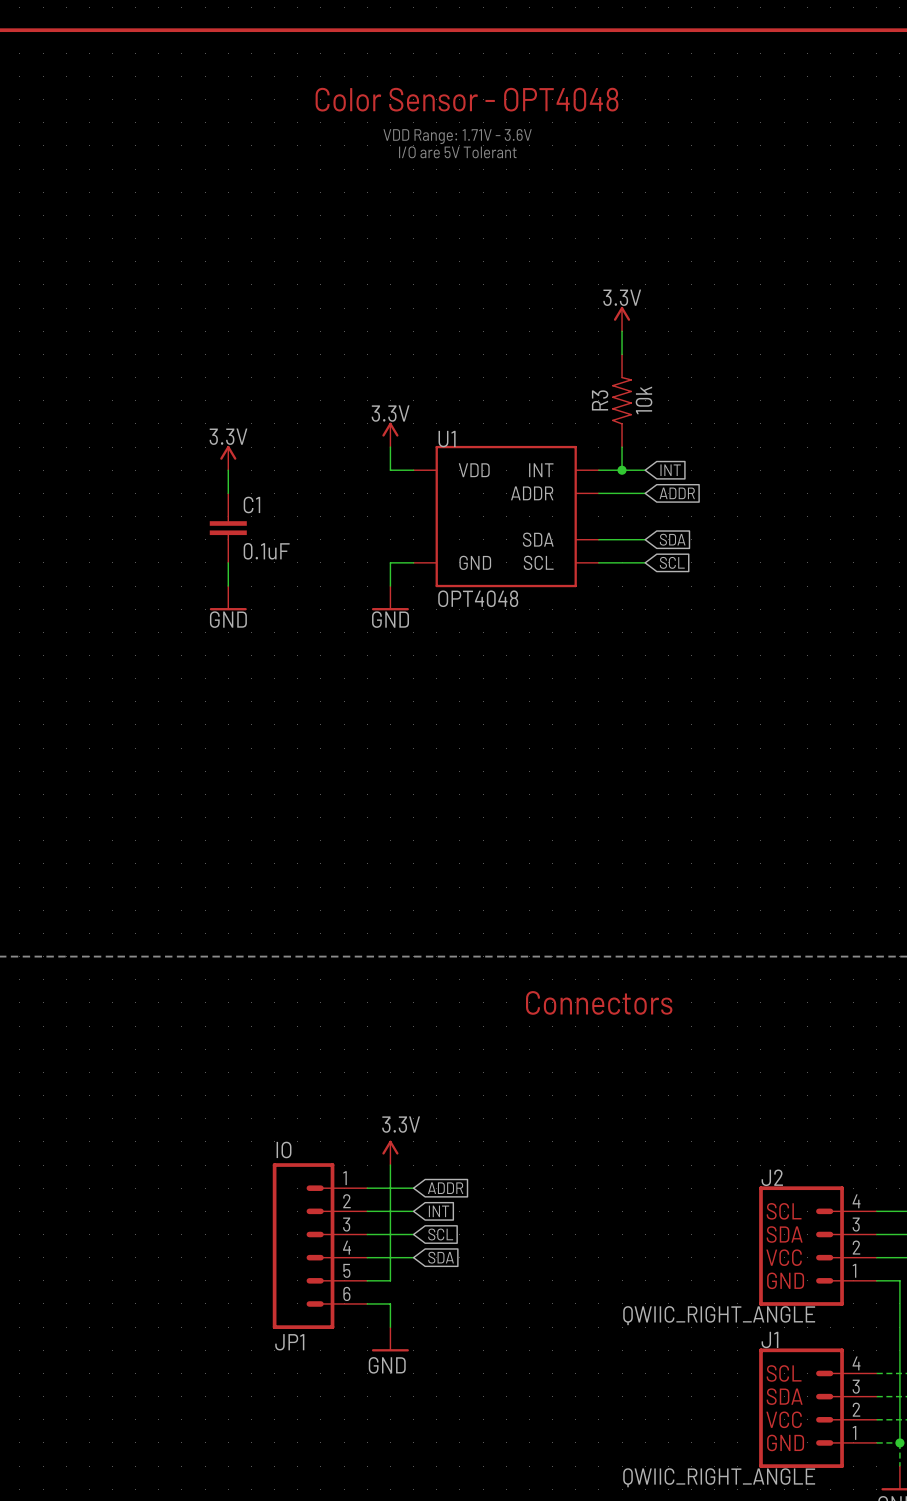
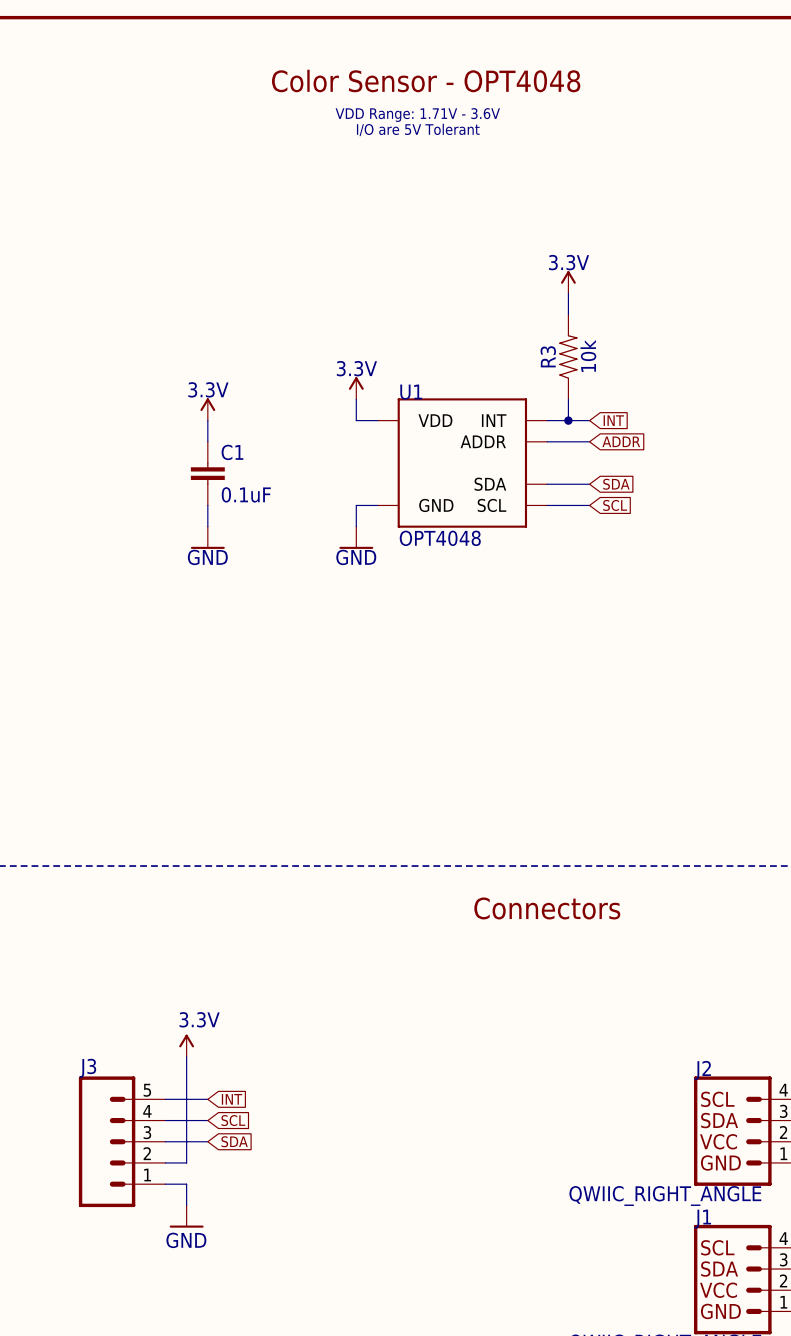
power symbol position: 3.3V (390, 1152) -> 3.3V (186, 1045)
wire: (390, 1165) (390, 1280) (367, 1280) -> (186, 1056) (186, 1162) (165, 1162)
wire: (367, 1188) (413, 1188) -> none
global label: ADDR (445, 1188) -> none
wire: (367, 1211) (413, 1211) -> (165, 1099) (207, 1099)
global label position: INT (439, 1211) -> INT (232, 1099)
wire: (367, 1234) (413, 1234) -> (165, 1120) (207, 1120)
global label position: SCL (440, 1234) -> SCL (233, 1120)
JP1: IO (320, 1246) -> none
J3: none -> (122, 1141)
wire: (367, 1257) (413, 1257) -> (165, 1141) (207, 1141)
global label position: SDA (441, 1257) -> SDA (234, 1141)
wire: (367, 1303) (390, 1303) (390, 1327) -> (165, 1184) (186, 1184) (186, 1205)
power symbol position: GND (390, 1339) -> GND (186, 1216)

